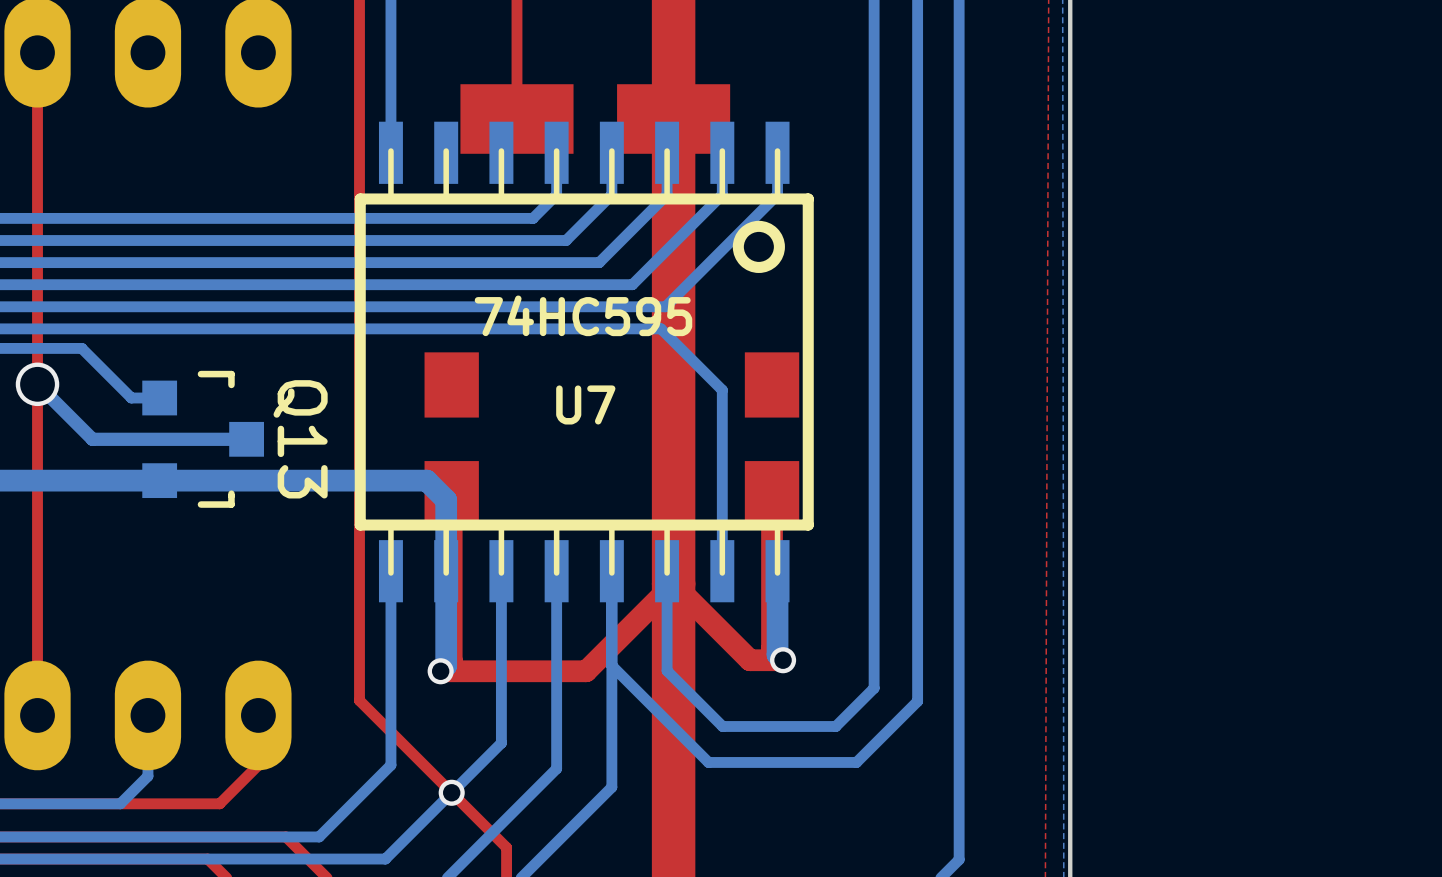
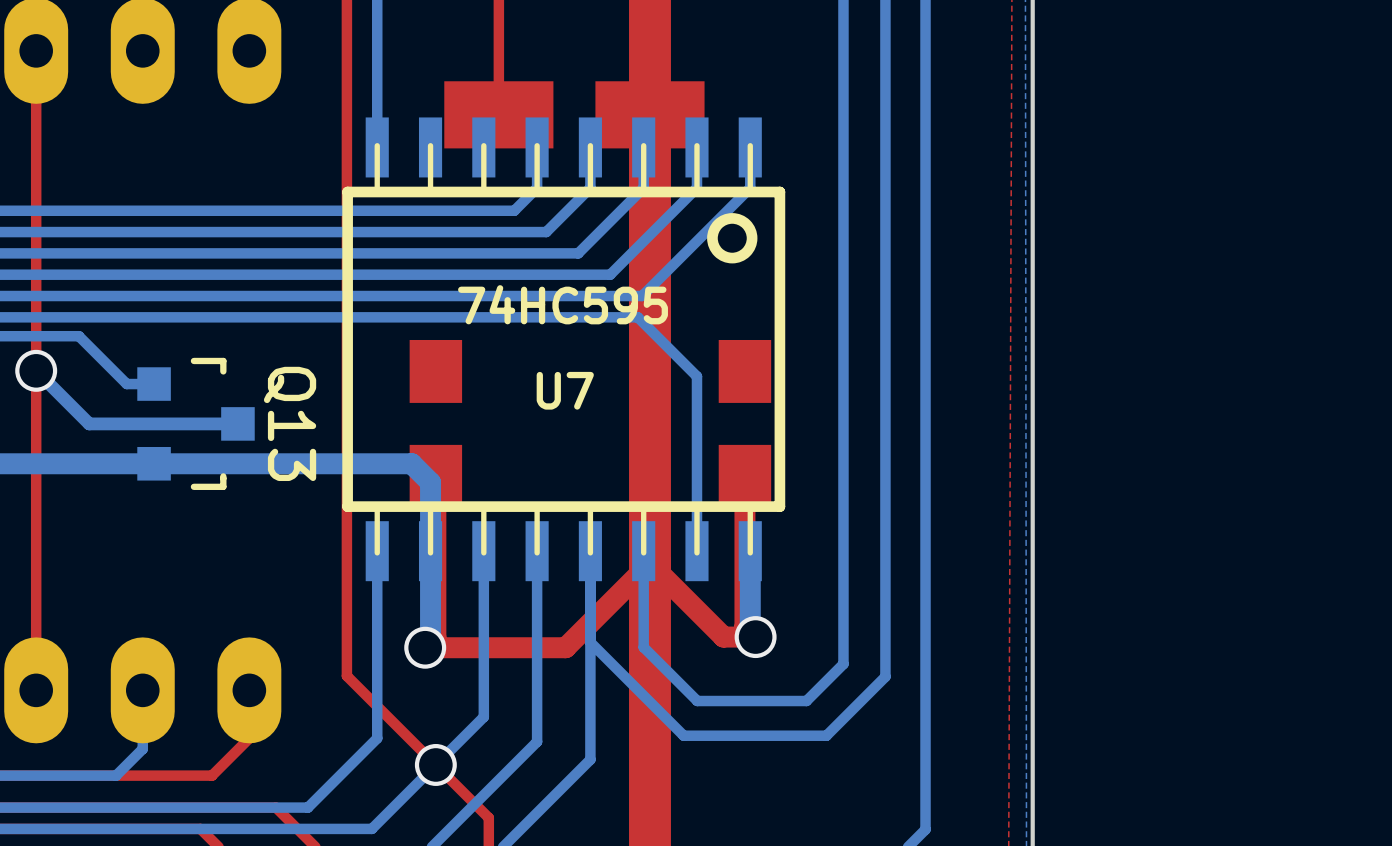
via size: [770, 647, 797, 674] -> [734, 616, 777, 659]
via size: [427, 658, 454, 685] -> [404, 626, 447, 669]
via size: [438, 779, 465, 806] -> [414, 743, 457, 786]

